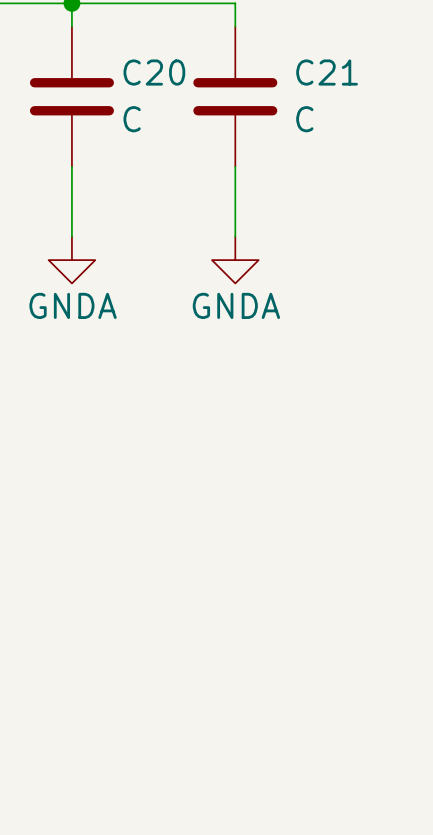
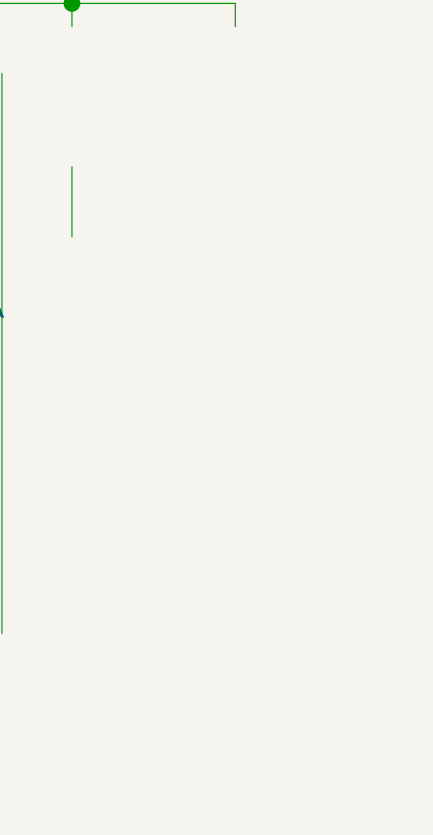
wire: none -> (1, 73) (1, 633)
C20: C (71, 96) -> none
C21: C (235, 96) -> none
wire: (235, 166) (235, 236) -> none
power symbol: GNDA (71, 260) -> none
power symbol: GNDA (235, 260) -> none

